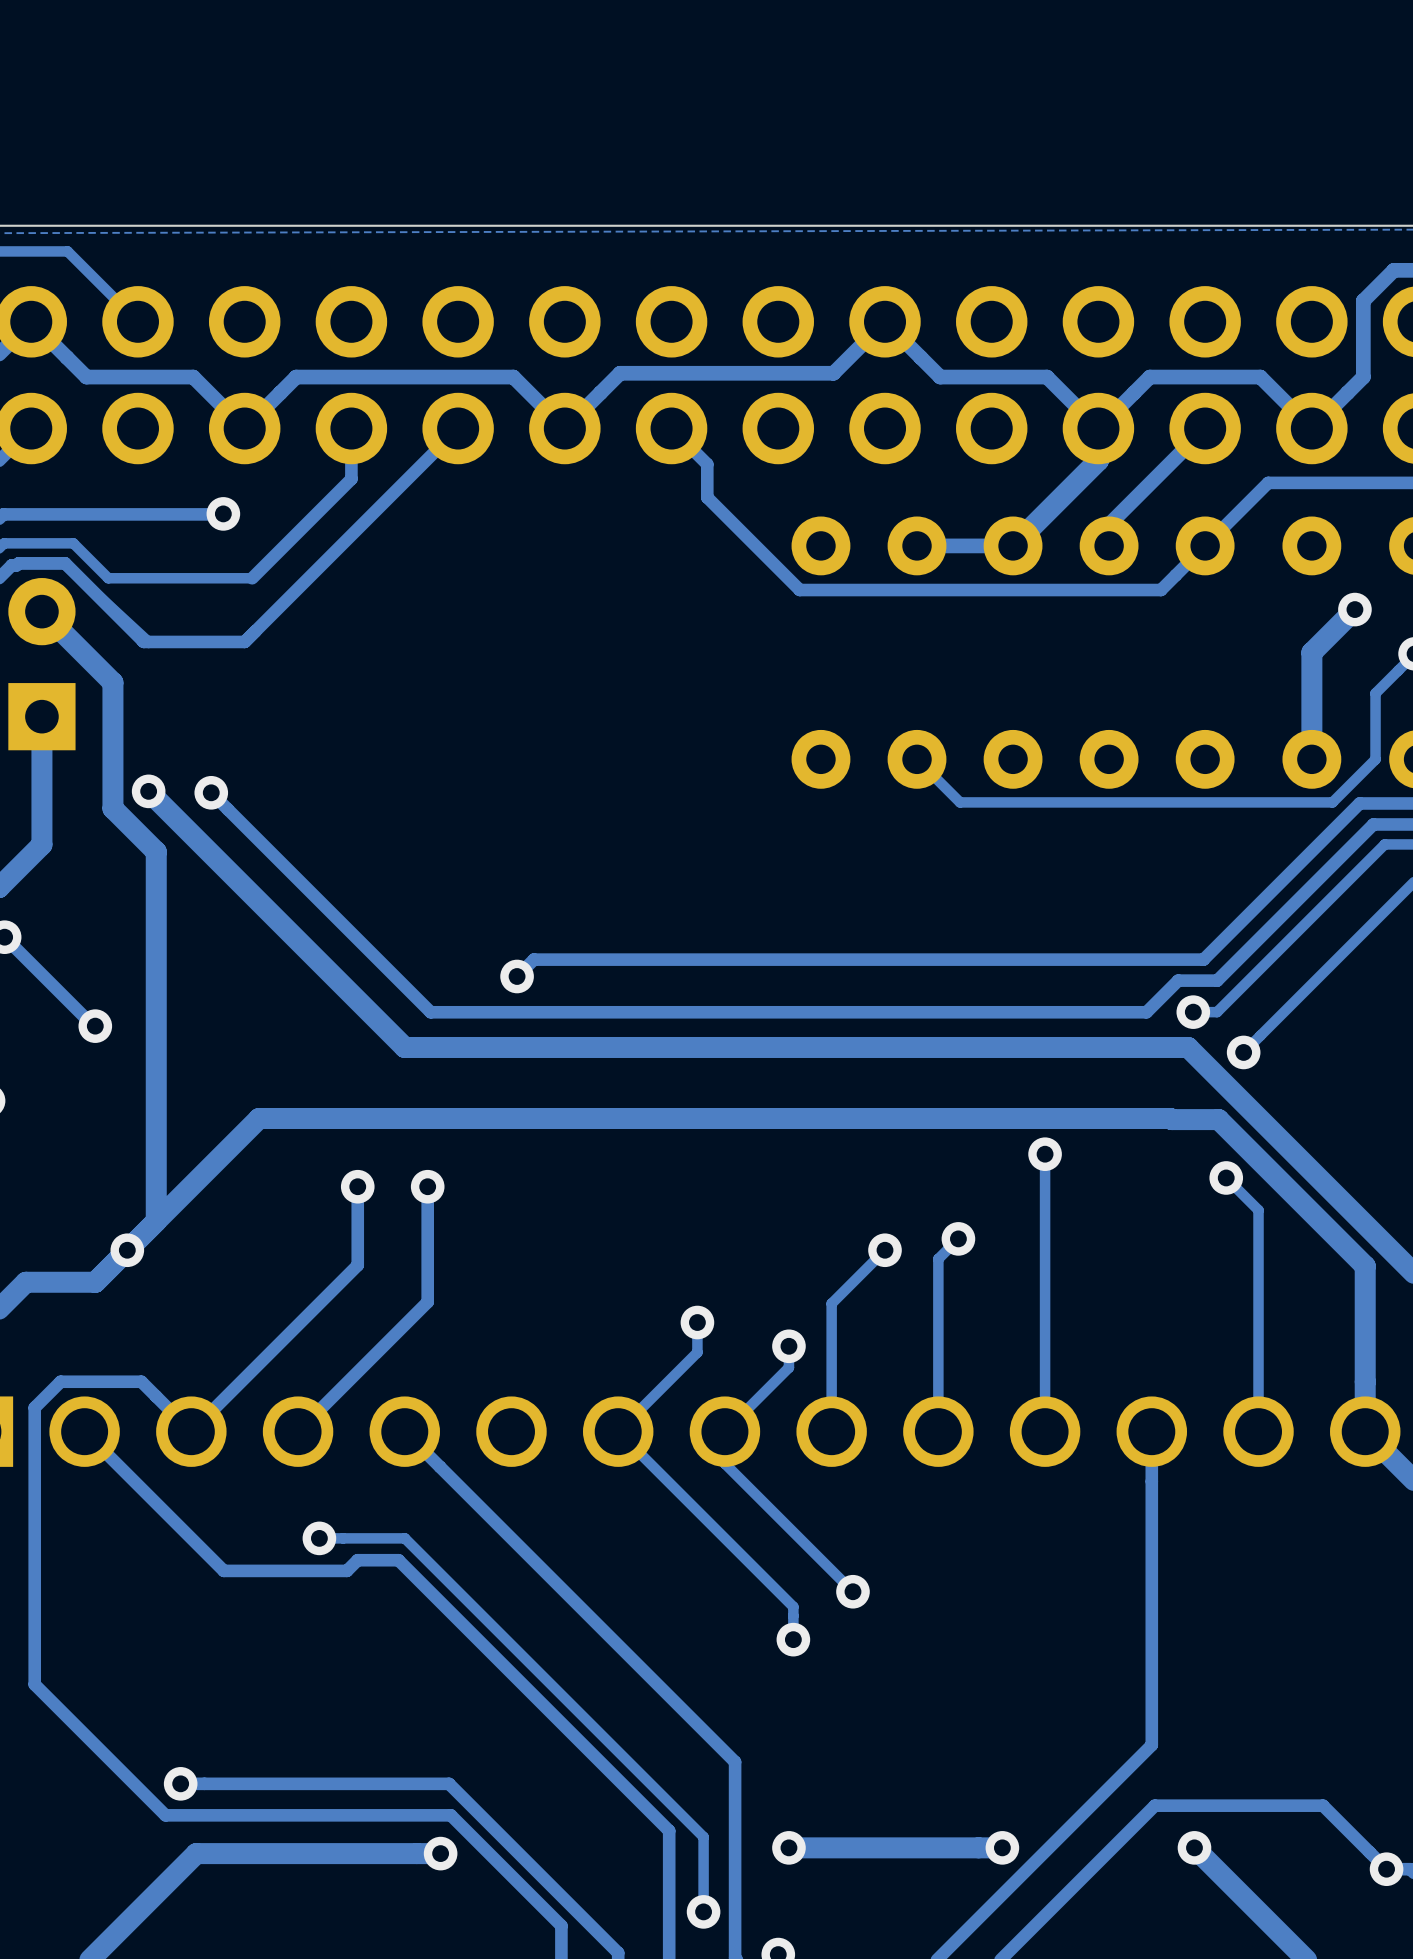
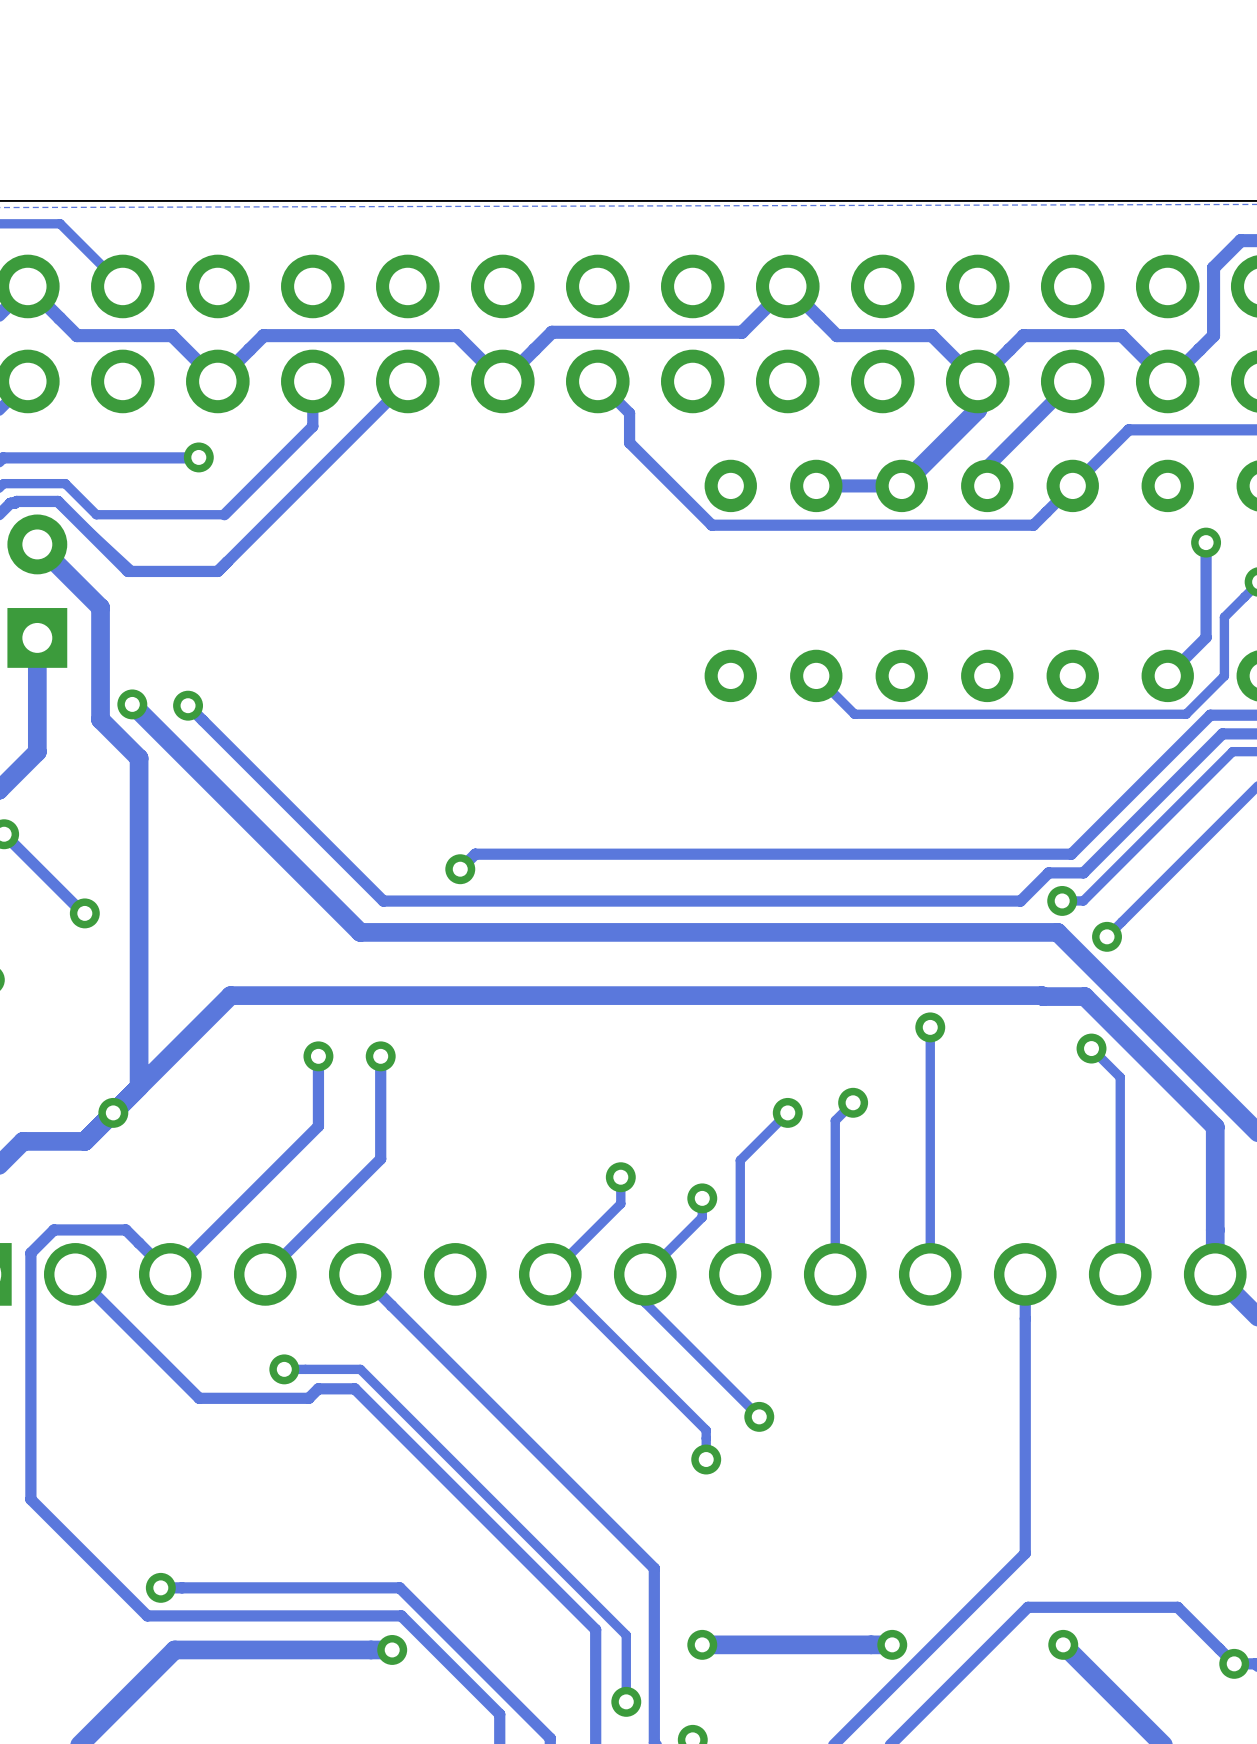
track: (1354, 609) (1311, 652) (1311, 759) -> (1206, 542) (1206, 637) (1167, 675)

